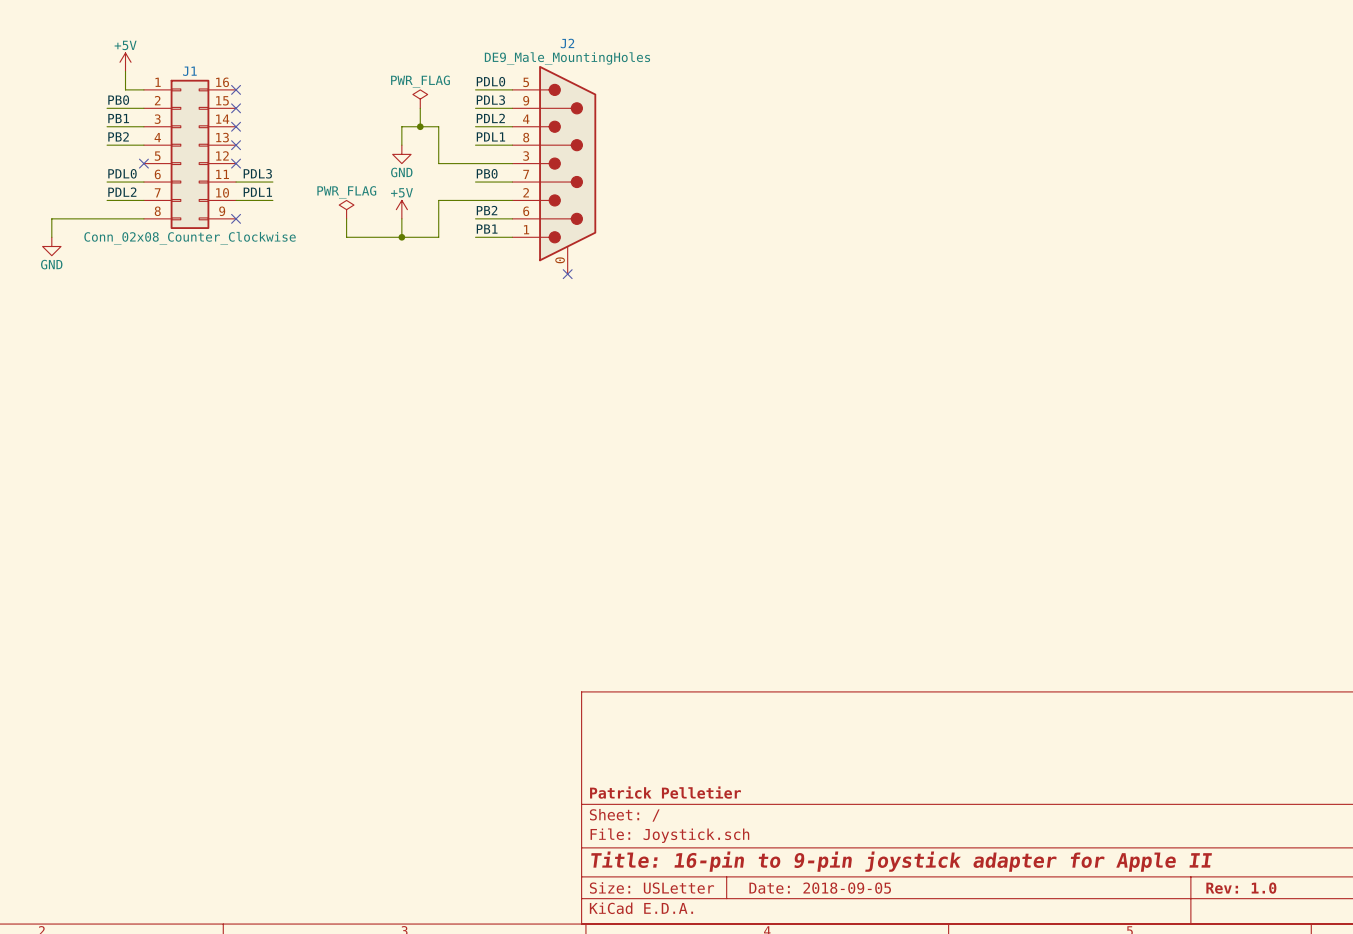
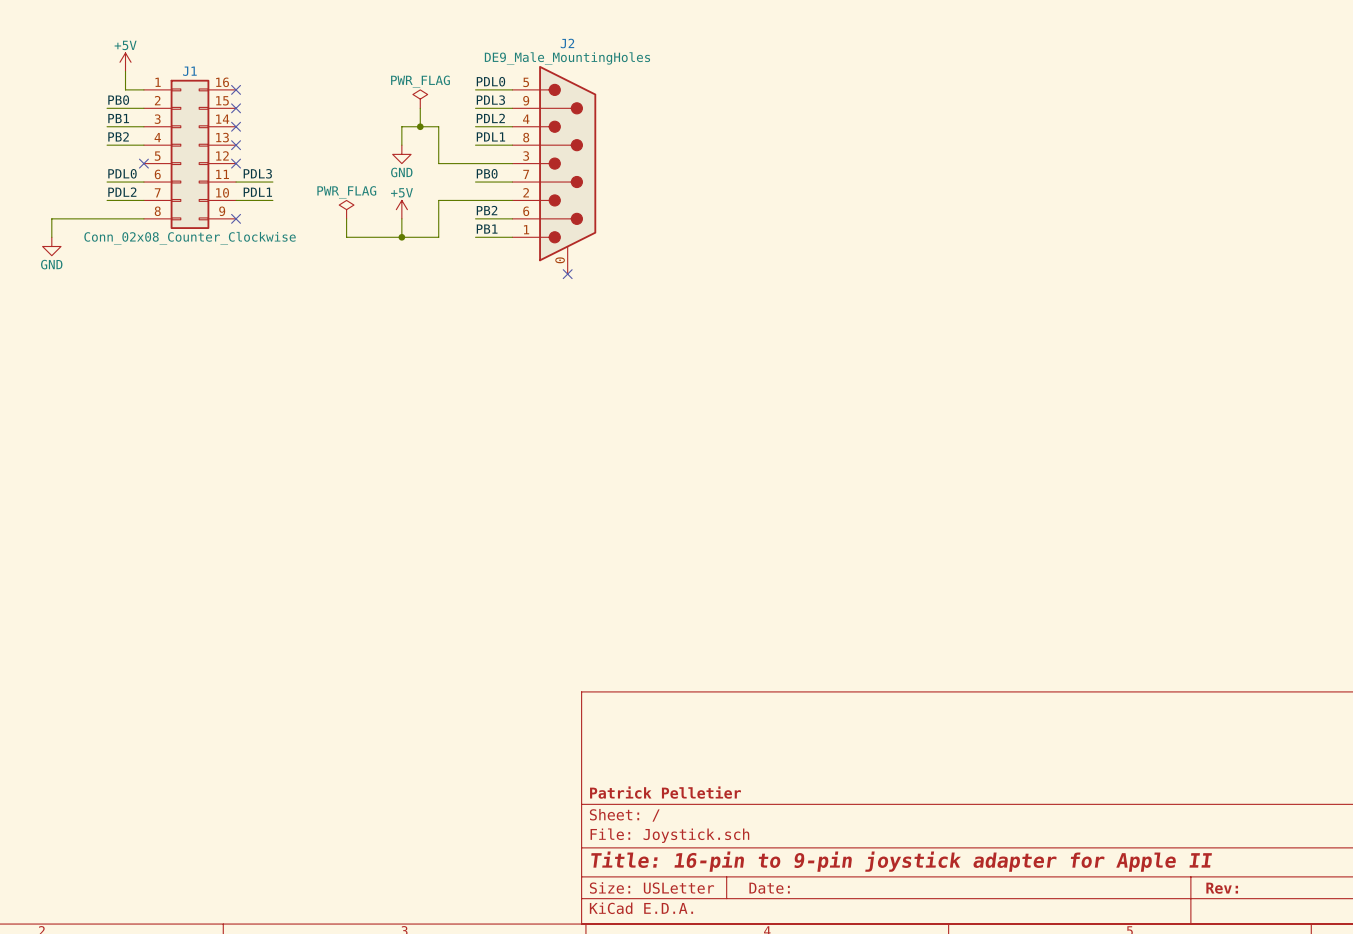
title block: Date: 2018-09-05 (820, 888) -> Date: (769, 888)
title block: Rev: 1.0 (1241, 888) -> Rev: (1222, 888)

